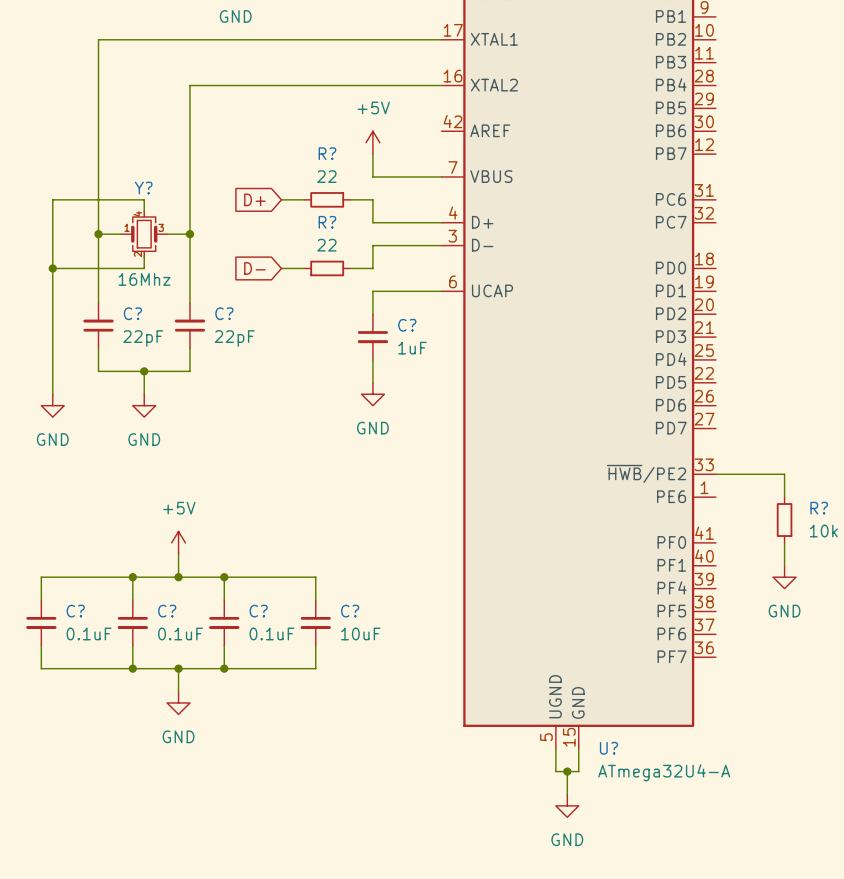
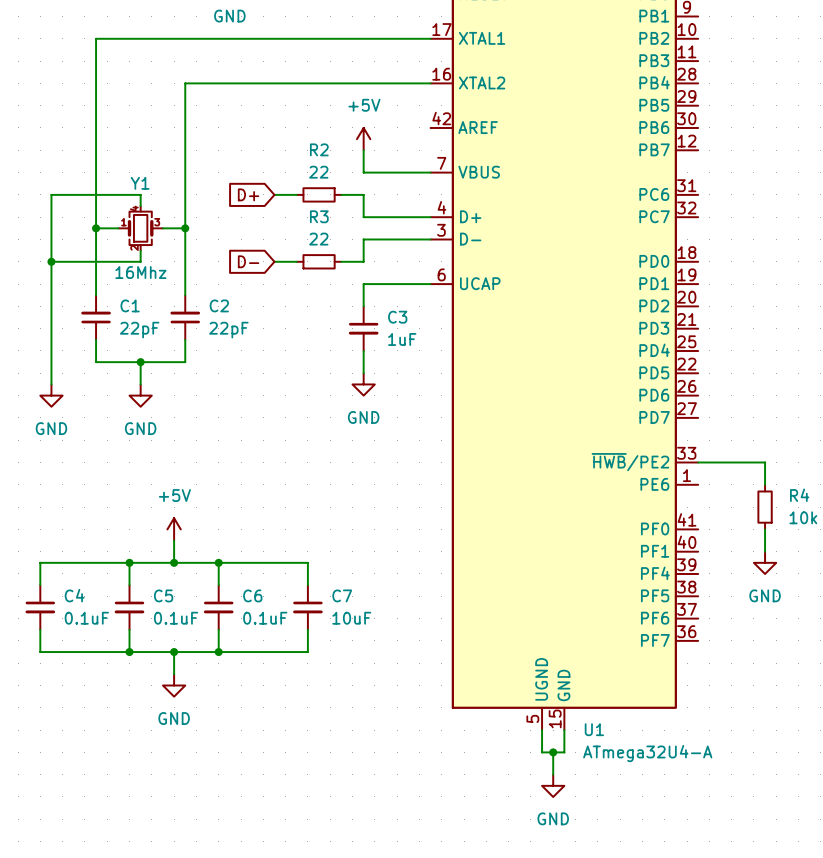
R? name: R? (327, 153) -> R2 (319, 149)
Y? name: Y? (143, 188) -> Y1 (140, 183)
R? name: R? (327, 222) -> R3 (319, 216)
C? name: C? (132, 313) -> C1 (130, 305)
C? name: C? (224, 313) -> C2 (219, 305)
C? name: C? (407, 325) -> C3 (397, 317)
R? name: R? (819, 508) -> R4 (799, 495)
C? name: C? (75, 611) -> C4 (74, 595)
C? name: C? (167, 611) -> C5 (163, 595)
C? name: C? (258, 611) -> C6 (252, 595)
C? name: C? (350, 611) -> C7 (342, 595)
U? name: U? (608, 748) -> U1 (594, 729)

